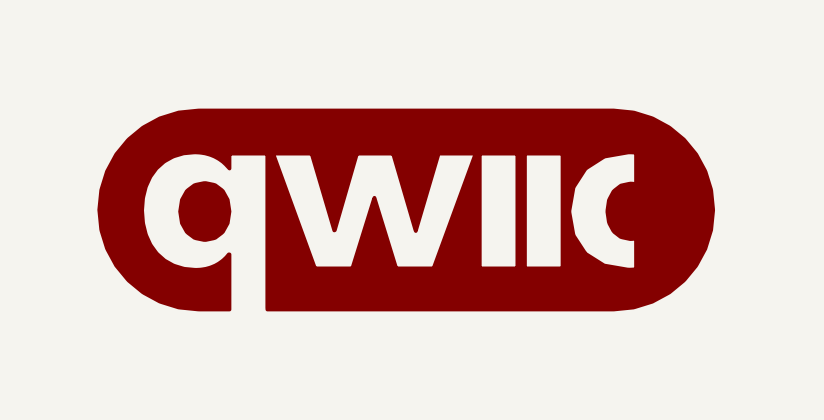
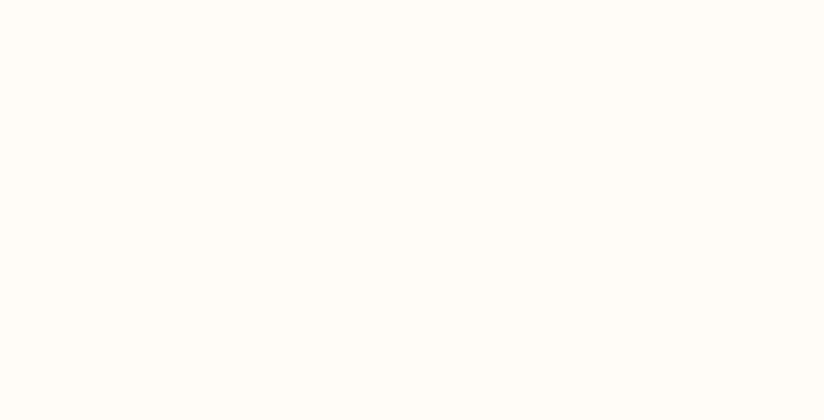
part: (406, 210) -> none

